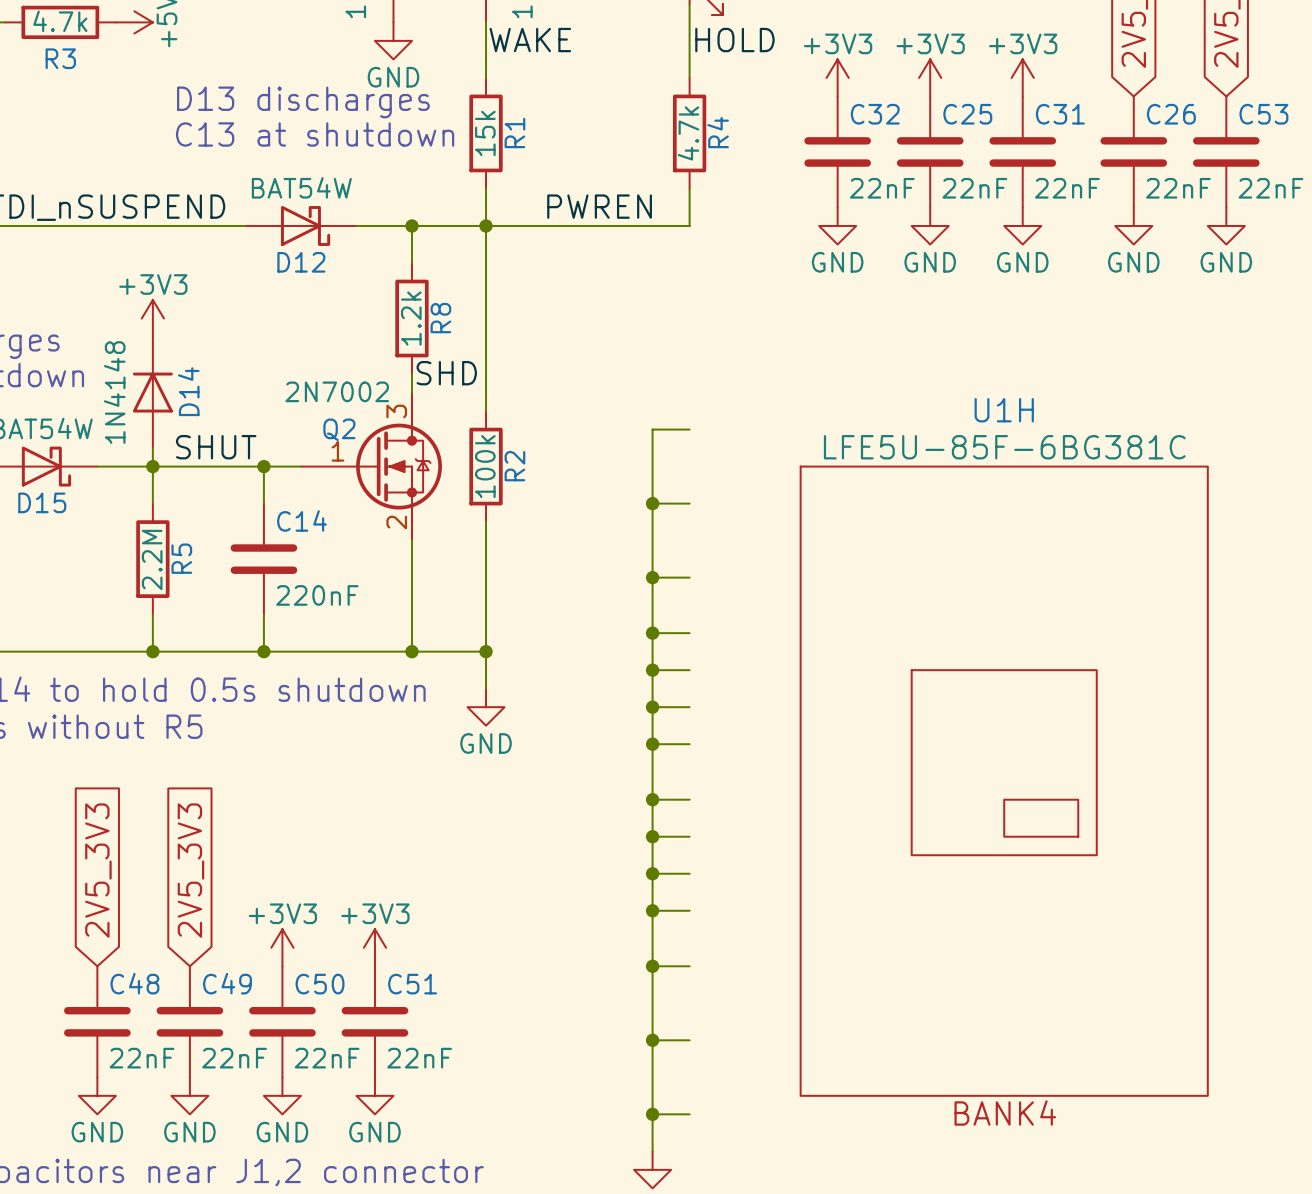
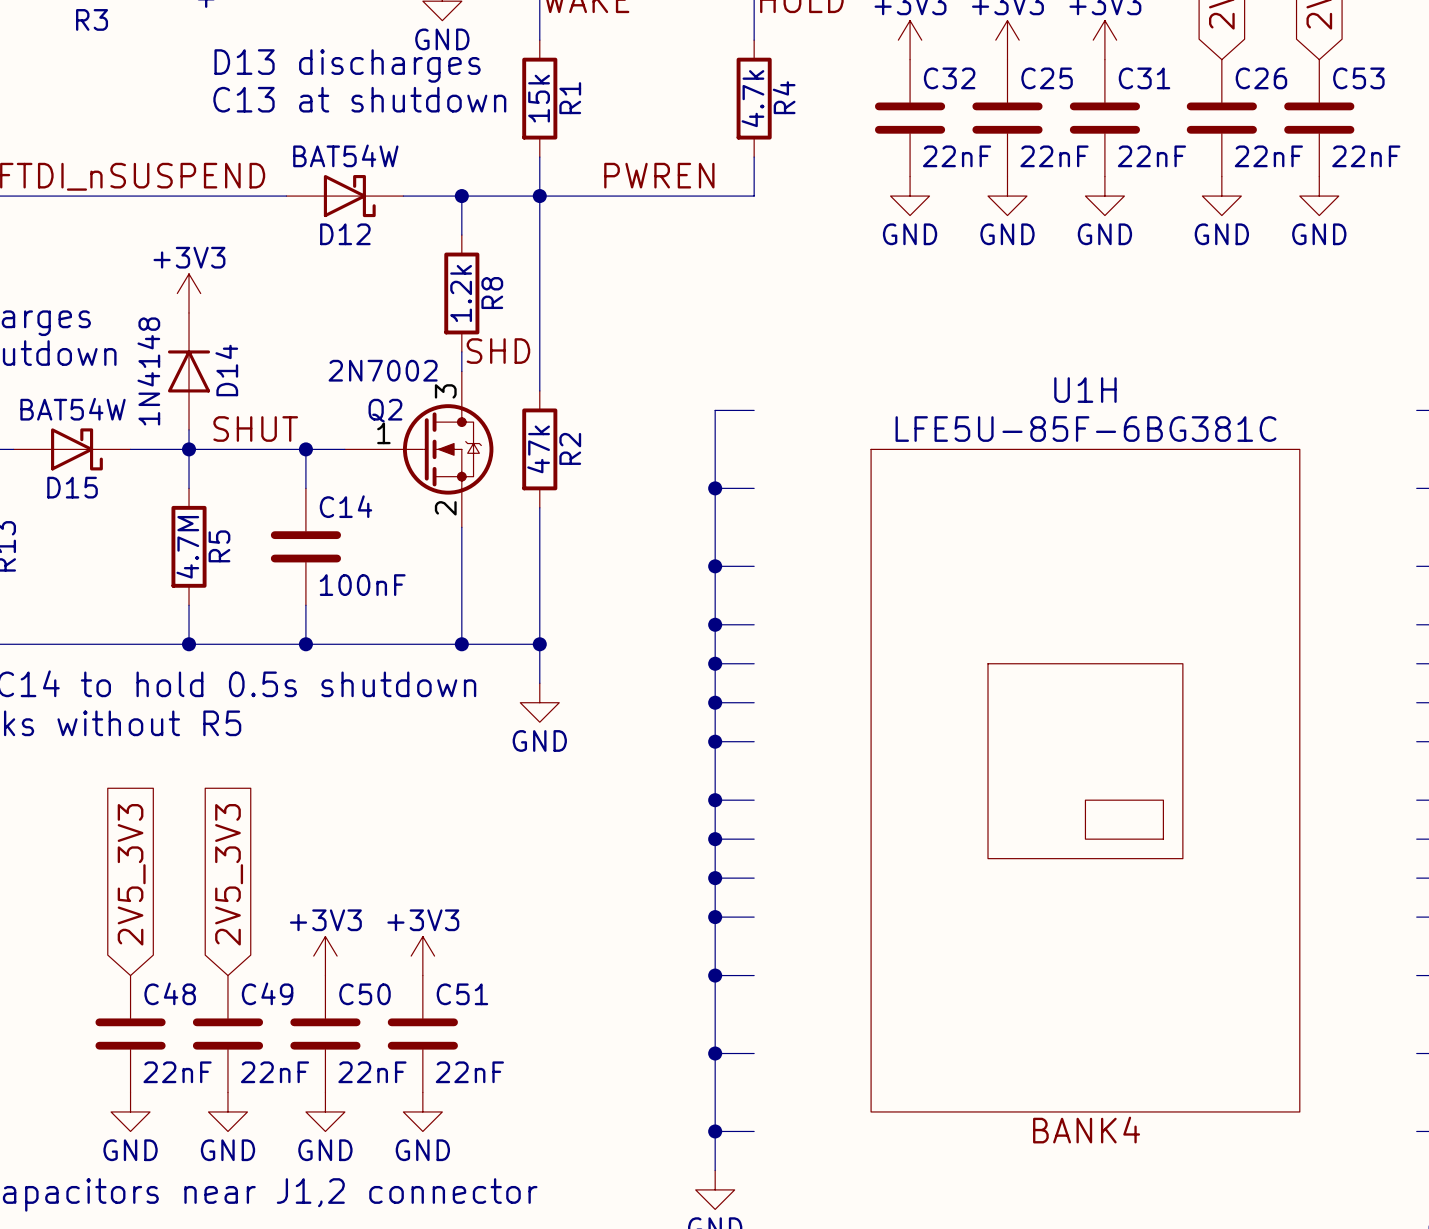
R2 value: 100k (485, 466) -> 47k (538, 449)
R5 value: 2.2M (152, 560) -> 4.7M (187, 547)
C14 value: 220nF (317, 595) -> 100nF (362, 585)

